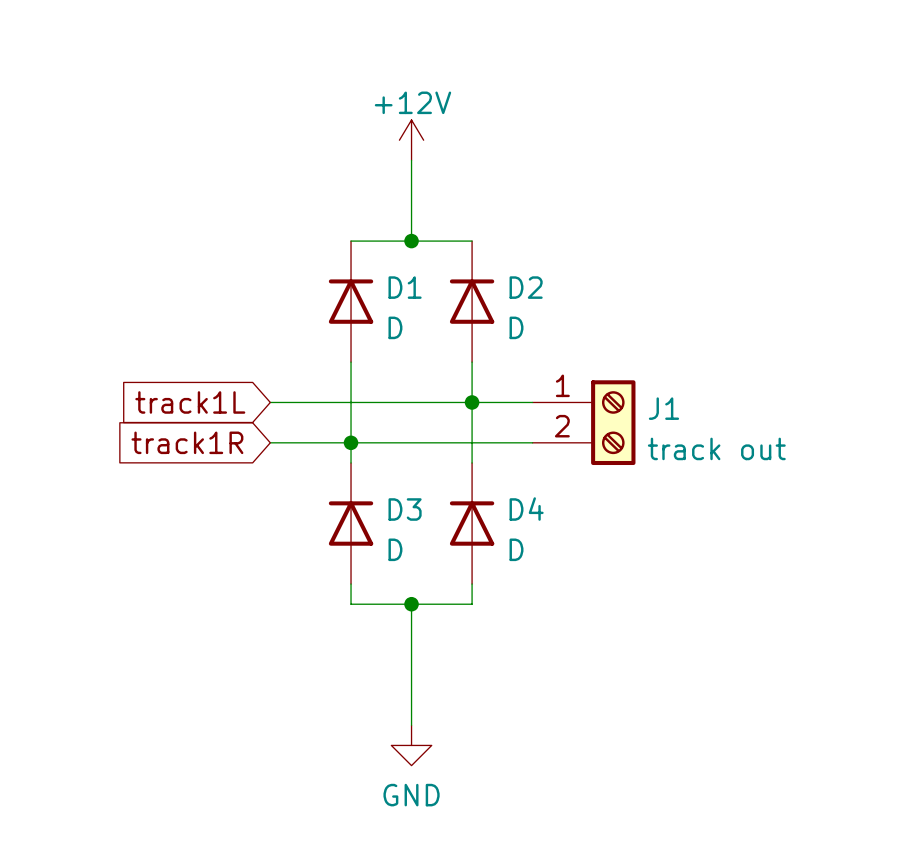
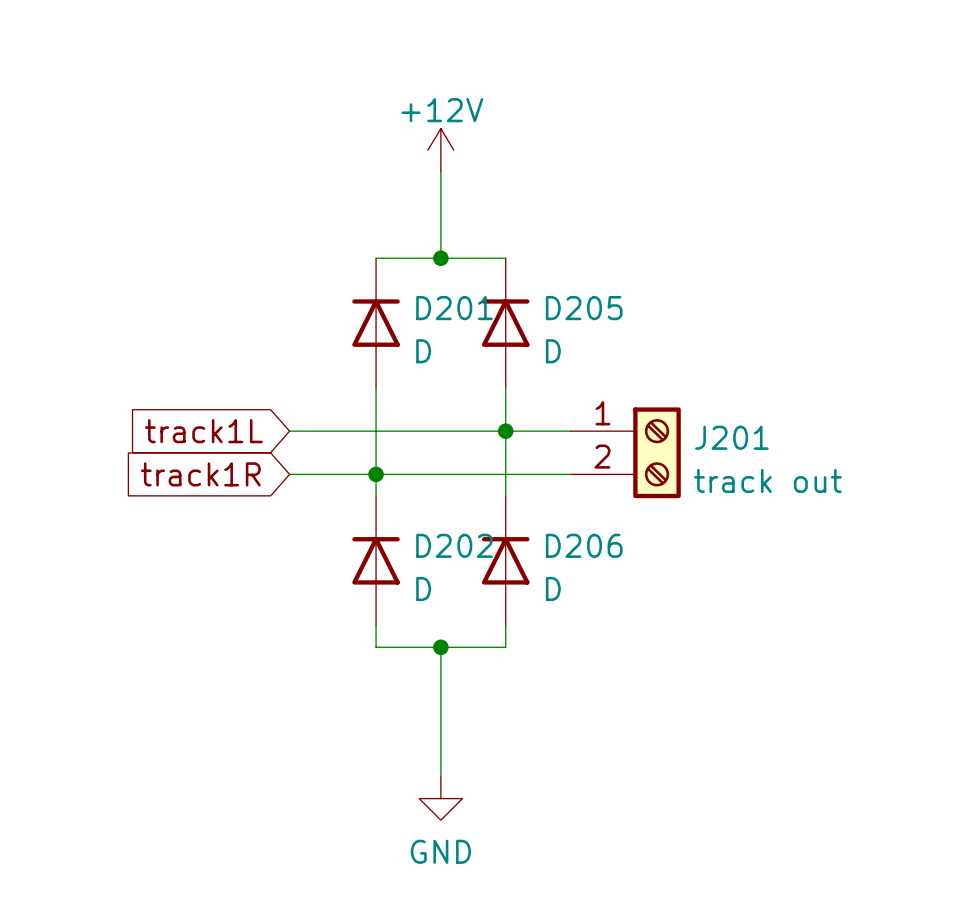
D1 name: D1 (405, 287) -> D201 (454, 308)
D2 name: D2 (526, 287) -> D205 (584, 308)
J1 name: J1 (663, 408) -> J201 (731, 437)
D3 name: D3 (405, 509) -> D202 (454, 545)
D4 name: D4 (526, 509) -> D206 (584, 545)

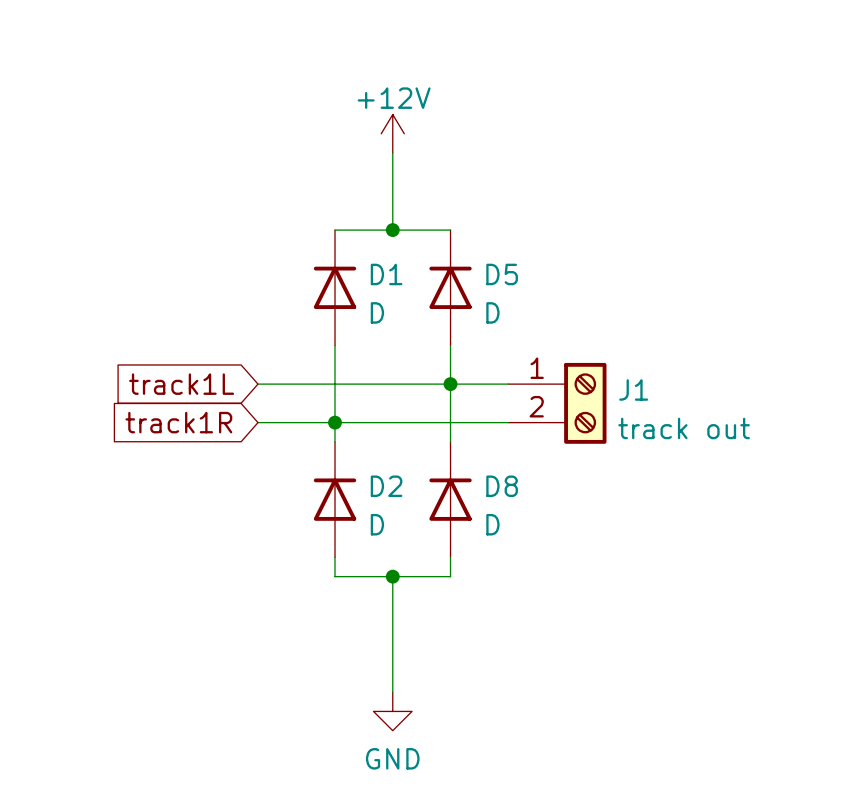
D201 name: D201 (454, 308) -> D1 (386, 274)
D205 name: D205 (584, 308) -> D5 (502, 274)
J201 name: J201 (731, 437) -> J1 (633, 389)
D202 name: D202 (454, 545) -> D2 (386, 486)
D206 name: D206 (584, 545) -> D8 (502, 486)

